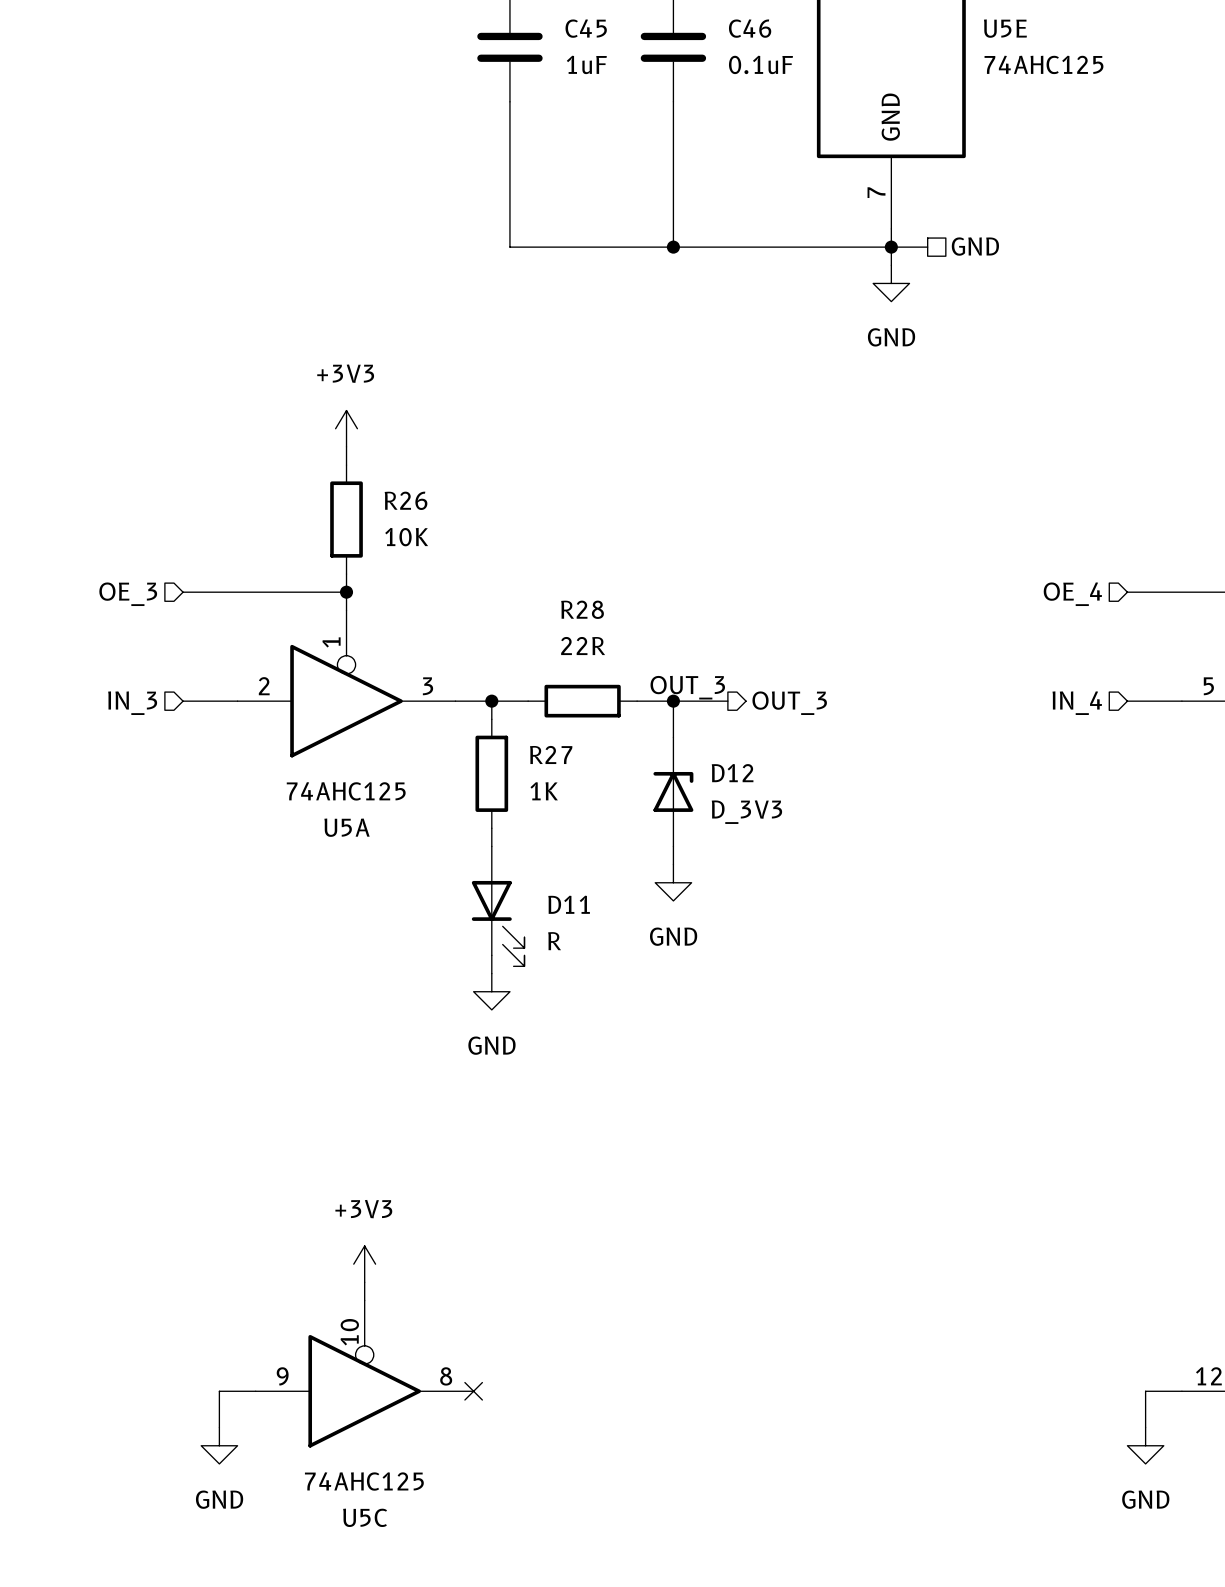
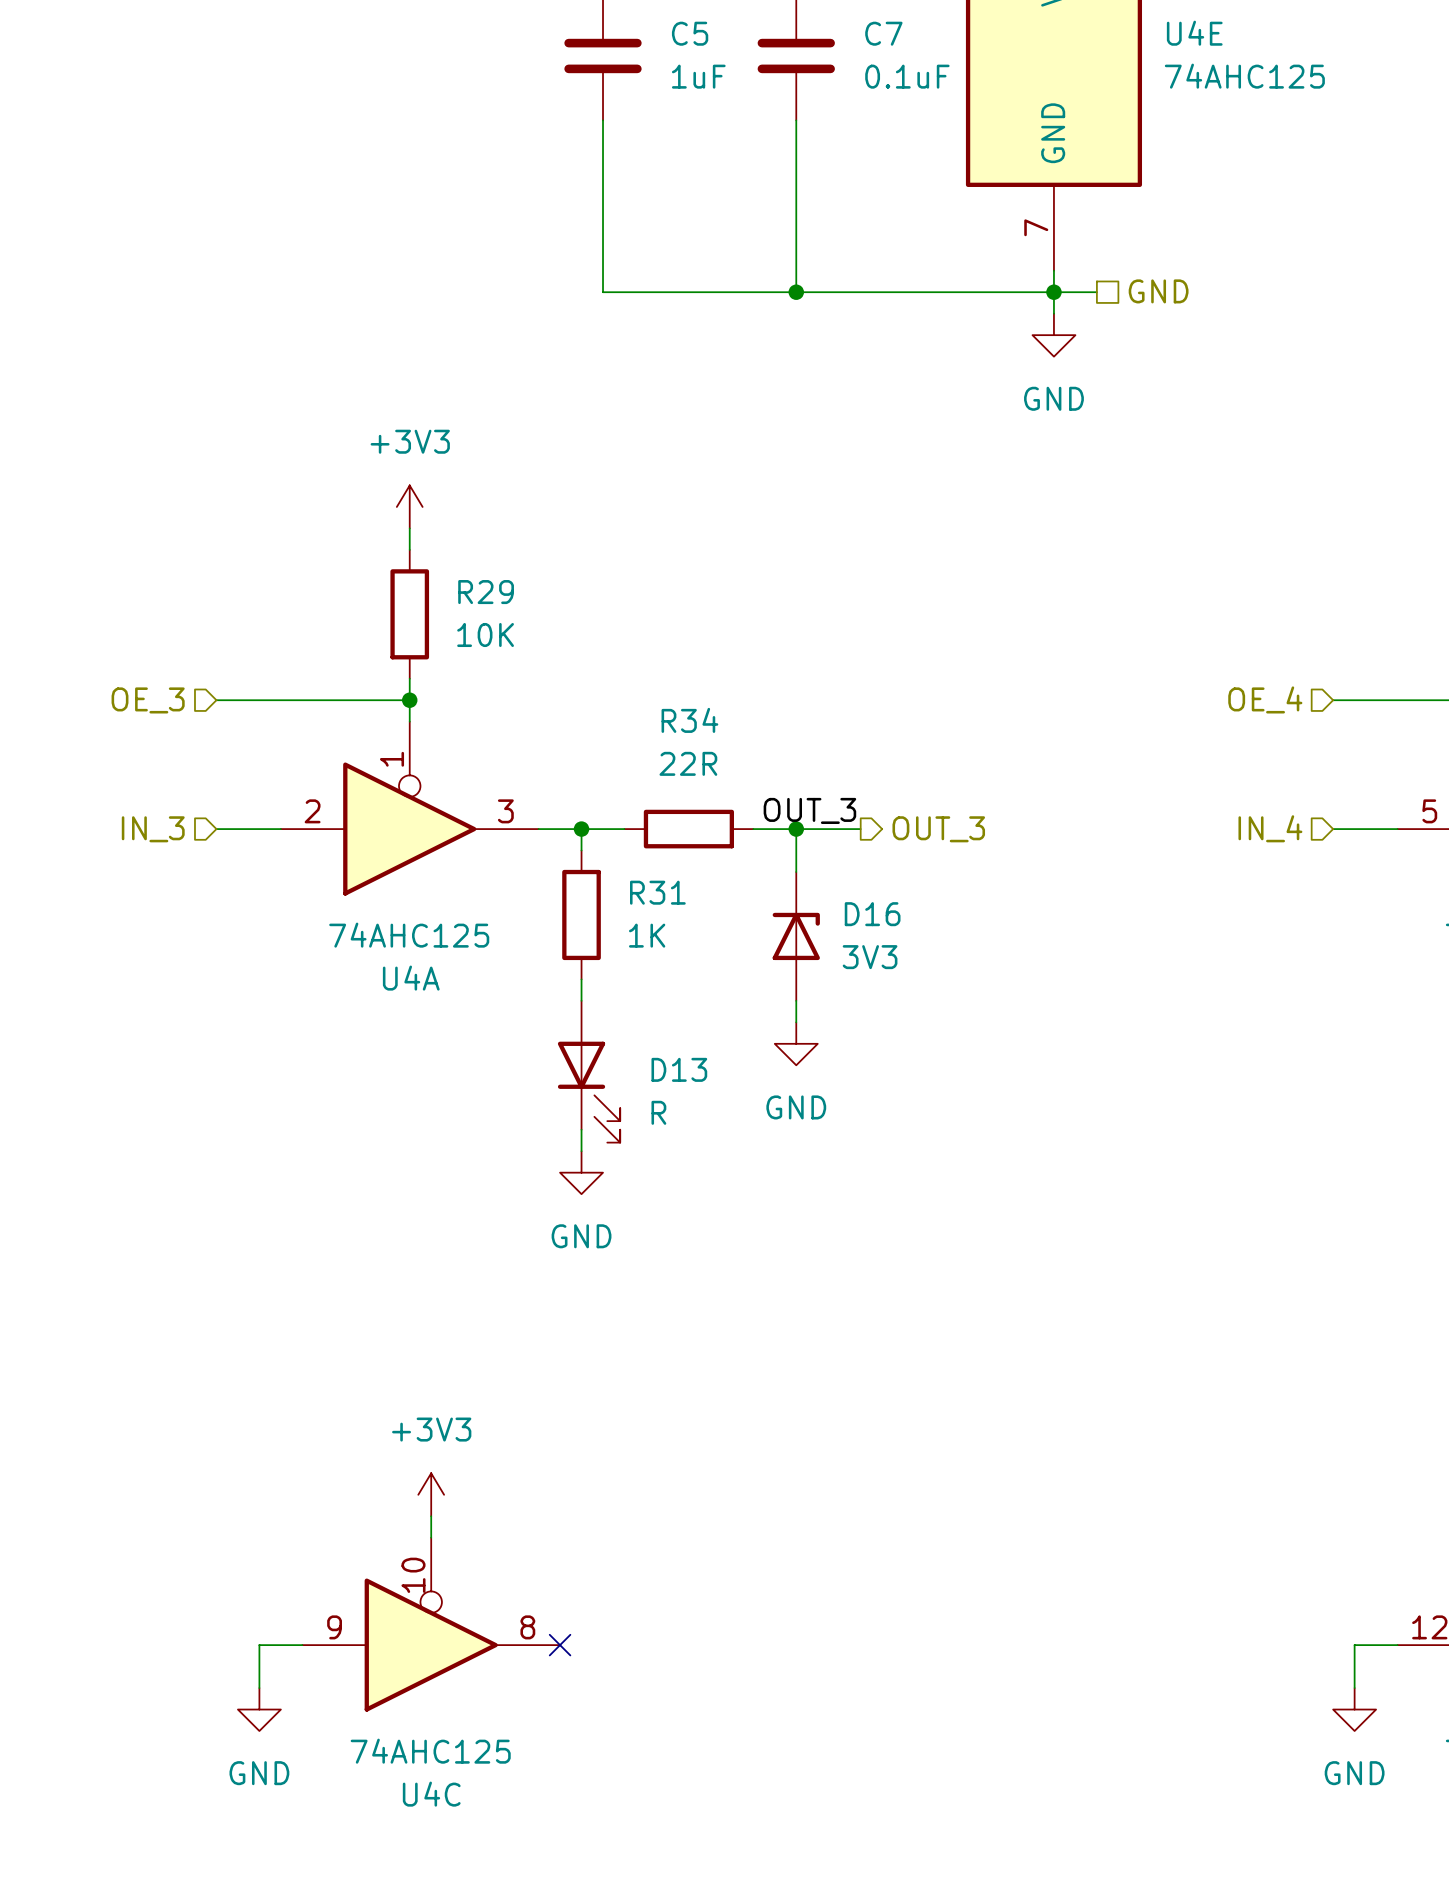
C45 name: C45 (586, 28) -> C5 (690, 33)
C46 name: C46 (750, 28) -> C7 (883, 33)
U5E name: U5E (1005, 28) -> U4E (1194, 33)
R26 name: R26 (406, 500) -> R29 (486, 592)
R28 name: R28 (582, 609) -> R34 (689, 720)
R27 name: R27 (551, 754) -> R31 (657, 892)
D12 name: D12 (732, 773) -> D16 (872, 914)
D12 value: D_3V3 (746, 812) -> 3V3 (870, 957)
U5A name: U5A (347, 827) -> U4A (411, 978)
D11 name: D11 (569, 904) -> D13 (679, 1069)
U5C name: U5C (365, 1517) -> U4C (431, 1794)

